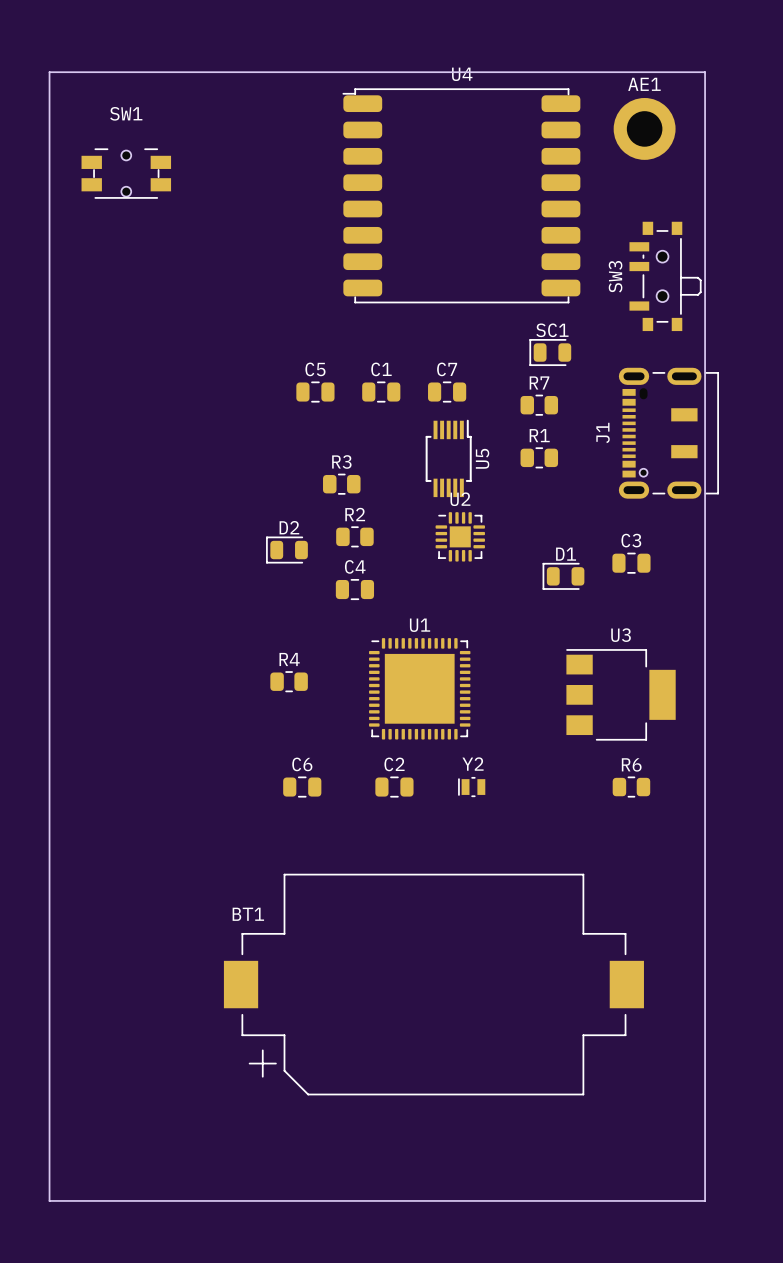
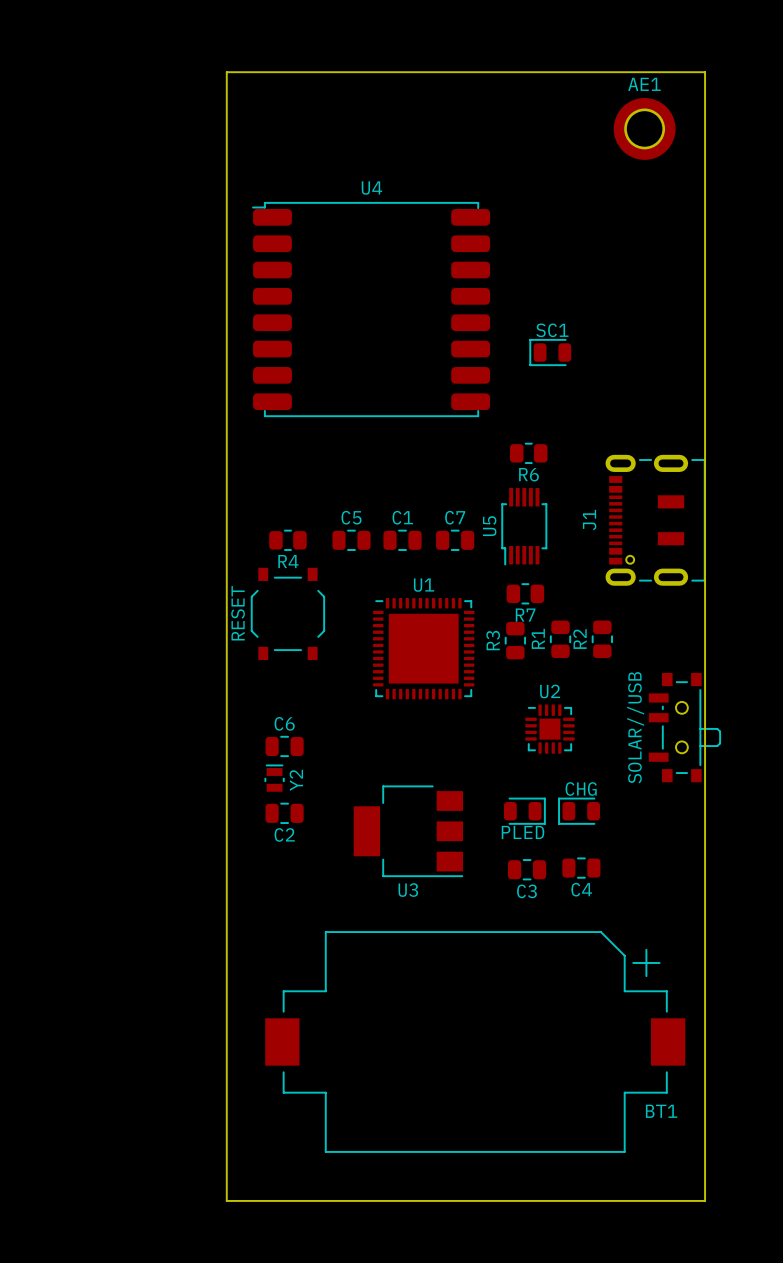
board edge: (226, 72) (49, 72) (49, 1200) (226, 1200) -> (226, 72) (226, 1200)
SW1: (126, 173) -> none
U4 position: (461, 195) -> (371, 309)
SW3: (665, 276) -> none
R7 name position: R7 (539, 382) -> R7 (525, 615)
C5 position: (315, 392) -> (351, 540)
C1 position: (381, 392) -> (402, 540)
C7 position: (447, 392) -> (455, 540)
R7 position: (539, 405) -> (525, 593)
J1 position: (668, 433) -> (655, 520)
R1 name position: R1 (539, 435) -> R1 (538, 638)
R1 rotation: 0° (539, 457) -> 90° clockwise (560, 639)
R1 position: (539, 457) -> (560, 639)
U5 rotation: 0° (448, 458) -> 180° (524, 526)
U5 position: (448, 458) -> (524, 526)
R3 name position: R3 (341, 461) -> R3 (493, 640)
R3 rotation: 0° (341, 484) -> 90° clockwise (515, 640)
R3 position: (341, 484) -> (515, 640)
R2 name position: R2 (355, 514) -> R2 (579, 639)
R2 rotation: 0° (354, 536) -> 90° clockwise (602, 639)
R2 position: (354, 536) -> (602, 639)
U2 position: (460, 536) -> (549, 729)
C3 name position: C3 (631, 540) -> C3 (526, 891)
D2: (286, 550) -> none
C3 position: (631, 563) -> (527, 869)
C4 name position: C4 (355, 566) -> C4 (581, 889)
D1: (563, 576) -> none
C4 position: (354, 589) -> (581, 868)
RESET: none -> (287, 613)
R4 name position: R4 (289, 659) -> R4 (288, 561)
R4 position: (289, 681) -> (287, 540)
U1 position: (419, 688) -> (423, 648)
U3 rotation: 0° (620, 694) -> 180° (408, 831)
U3 position: (620, 694) -> (408, 831)
SOLAR//USB: none -> (684, 727)
C2 name position: C2 (394, 764) -> C2 (284, 834)
R6 name position: R6 (631, 764) -> R6 (528, 474)
C6 position: (302, 787) -> (284, 746)
C2 position: (394, 787) -> (284, 813)
Y2 rotation: 0° (471, 787) -> 90° clockwise (274, 778)
Y2 position: (471, 787) -> (274, 778)
R6 position: (631, 787) -> (528, 453)
PLED: none -> (524, 811)
CHG: none -> (579, 811)
BT1 rotation: 0° (433, 984) -> 180° (475, 1041)

